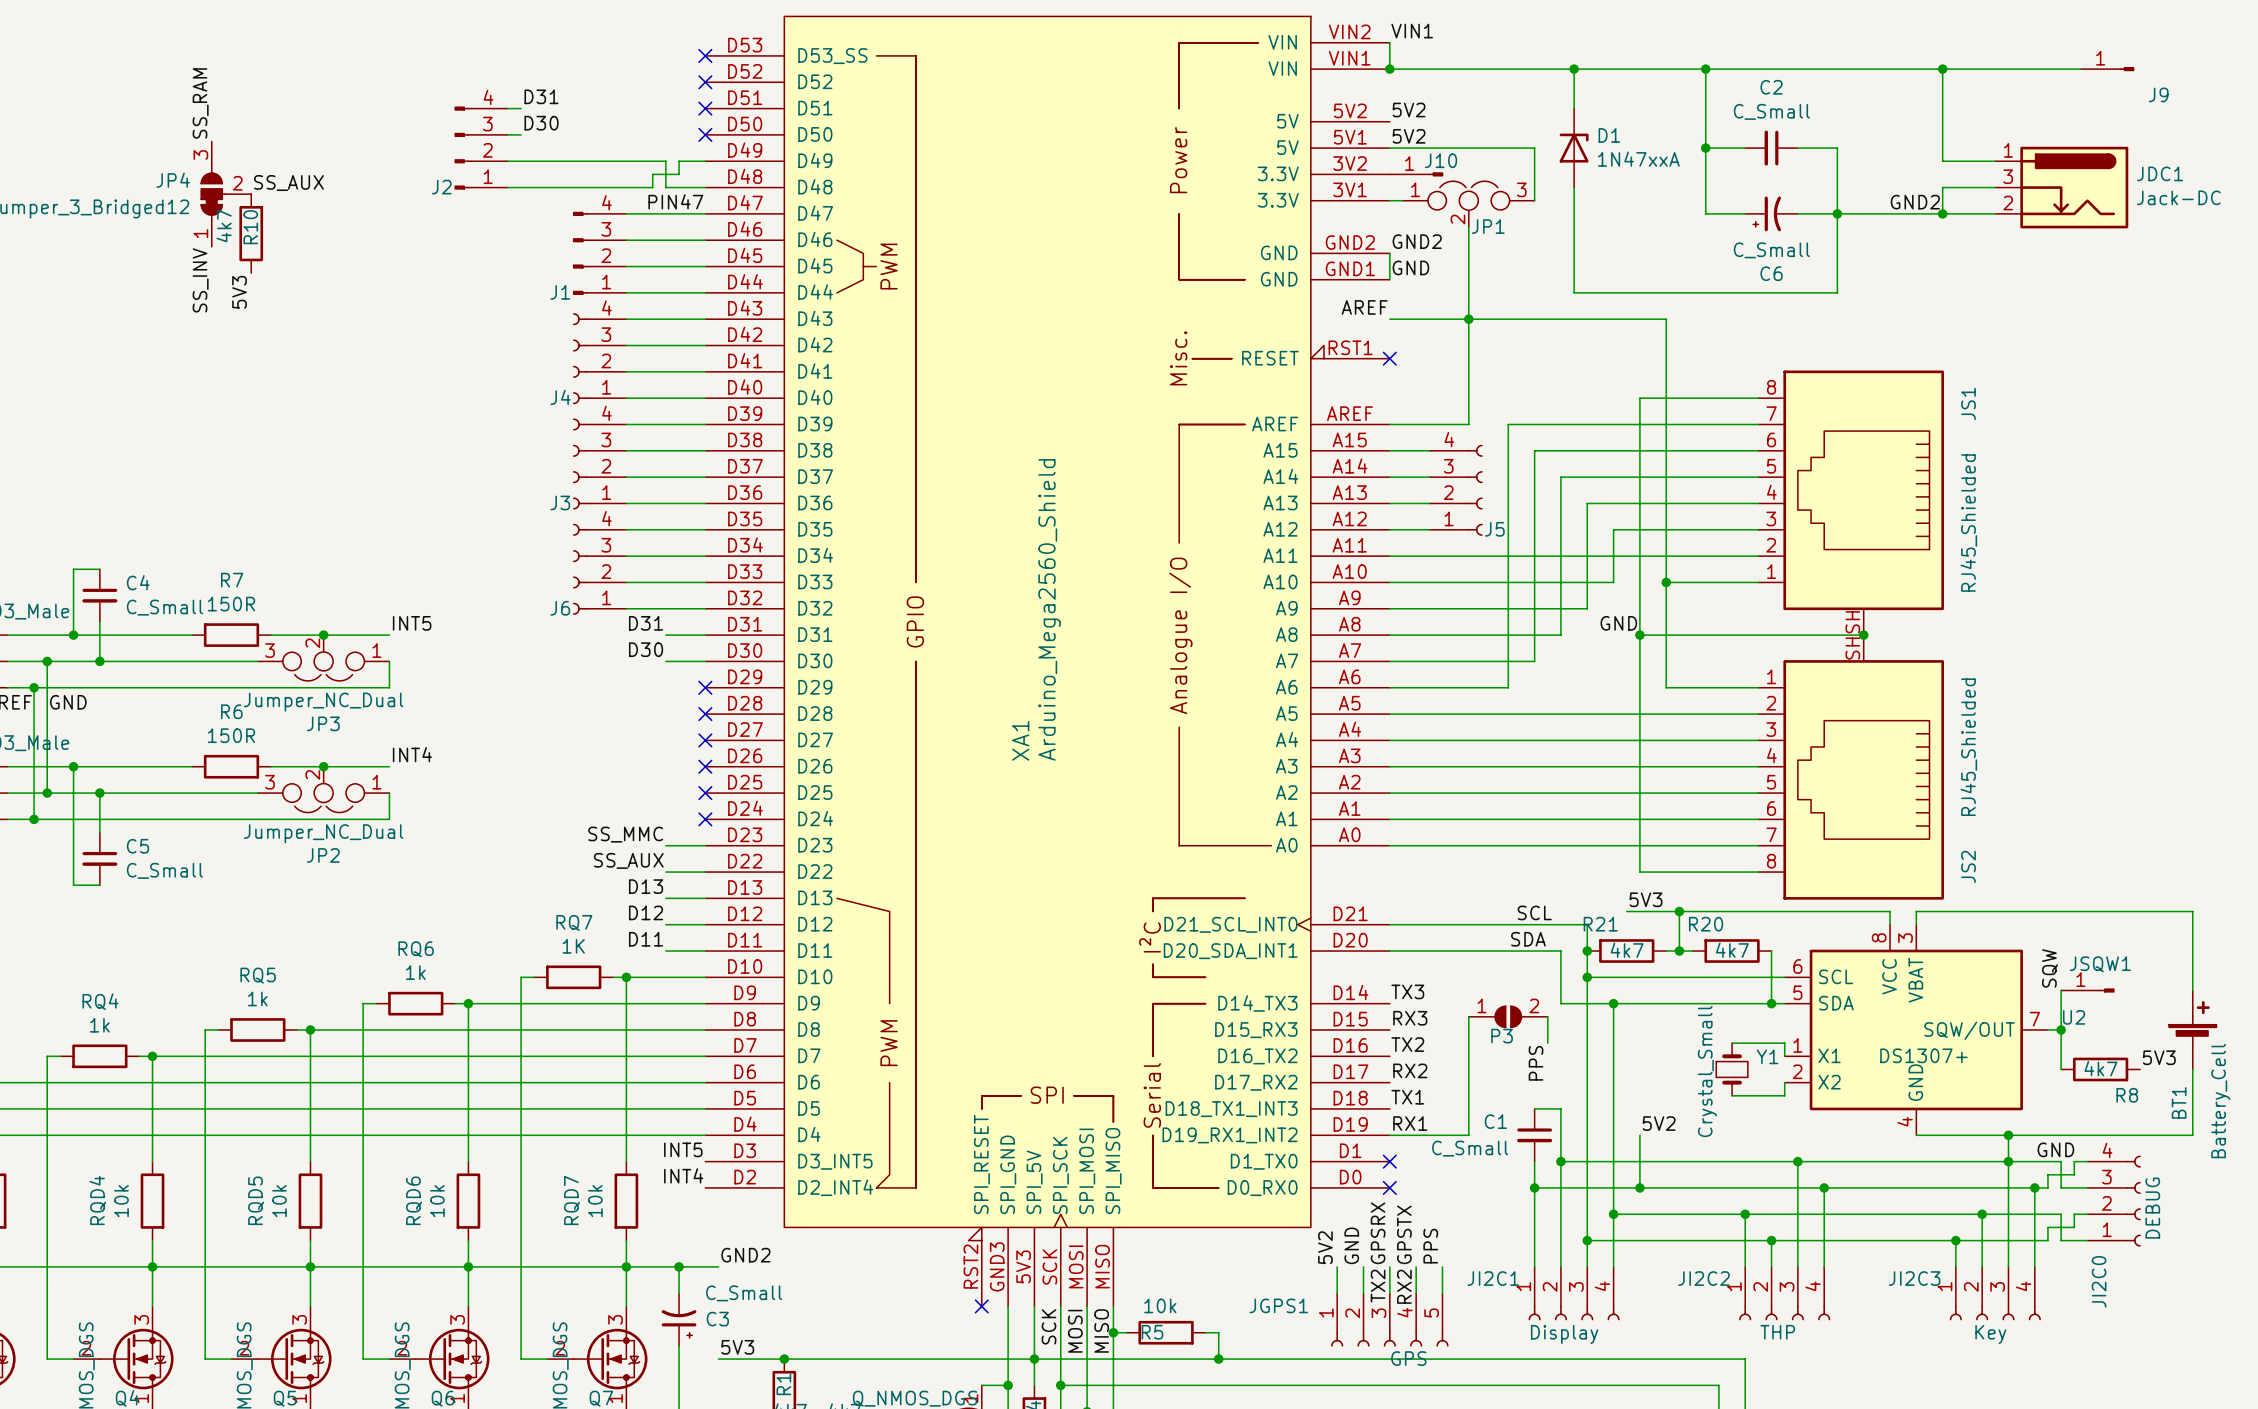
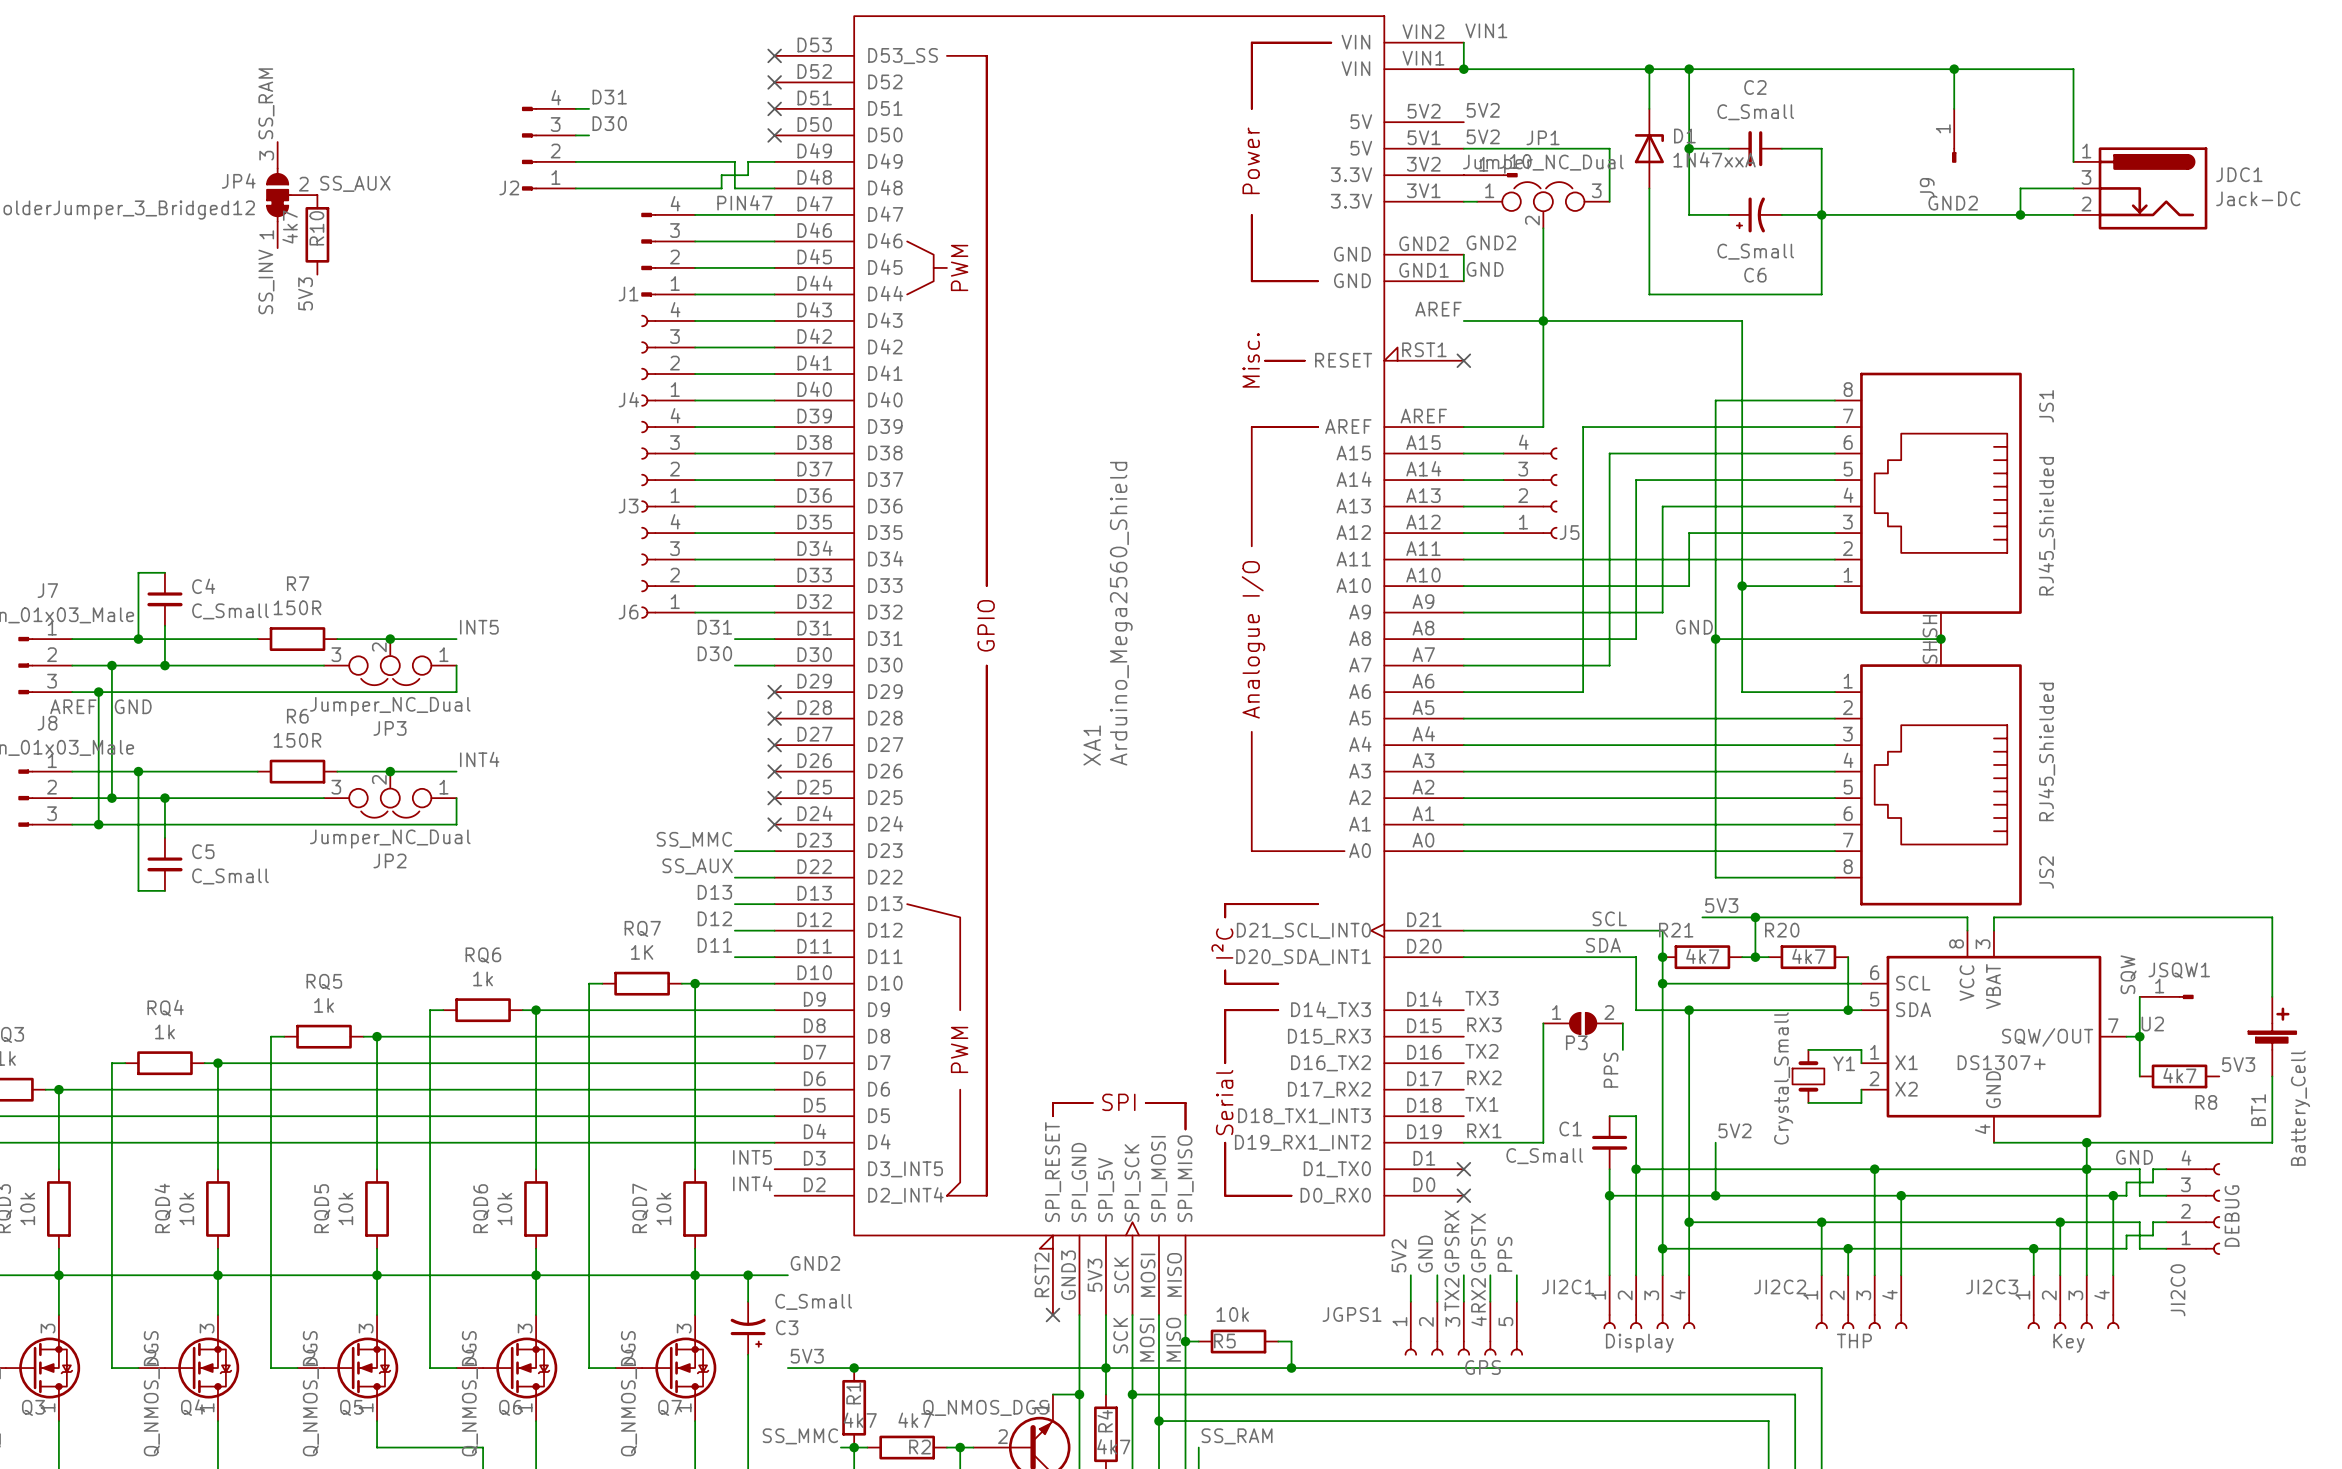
wire: none -> (1689, 69) (1689, 214) (1728, 214)
junction: none -> (1689, 69)
wire: (1705, 69) (1705, 213) -> none
junction: (1705, 69) -> none
wire: none -> (1954, 69) (1954, 108)
junction: none -> (1954, 69)
wire: (1942, 69) (1942, 161) (1995, 161) -> (2073, 69) (2073, 161)
junction: (1942, 69) -> none
wire: (1995, 69) (2080, 69) -> none
J9 position: (2107, 69) -> (1954, 135)
J9 rotation: 0° (2126, 69) -> 90° clockwise (1954, 155)
wire: none -> (1689, 148) (1728, 148)
junction: none -> (1689, 148)
junction: (1705, 148) -> none
C2 position: (1771, 148) -> (1755, 148)
wire: (1797, 148) (1837, 148) (1837, 292) (1745, 292) -> (1821, 148) (1821, 294)
JP1 value: none -> Jumper_NC_Dual (1543, 164)
label position: GND2 (1915, 202) -> GND2 (1953, 203)
junction: none -> (1821, 214)
C6 position: (1771, 213) -> (1755, 214)
junction: (1837, 213) -> none
JP1 name position: JP1 (1488, 226) -> JP1 (1543, 137)

